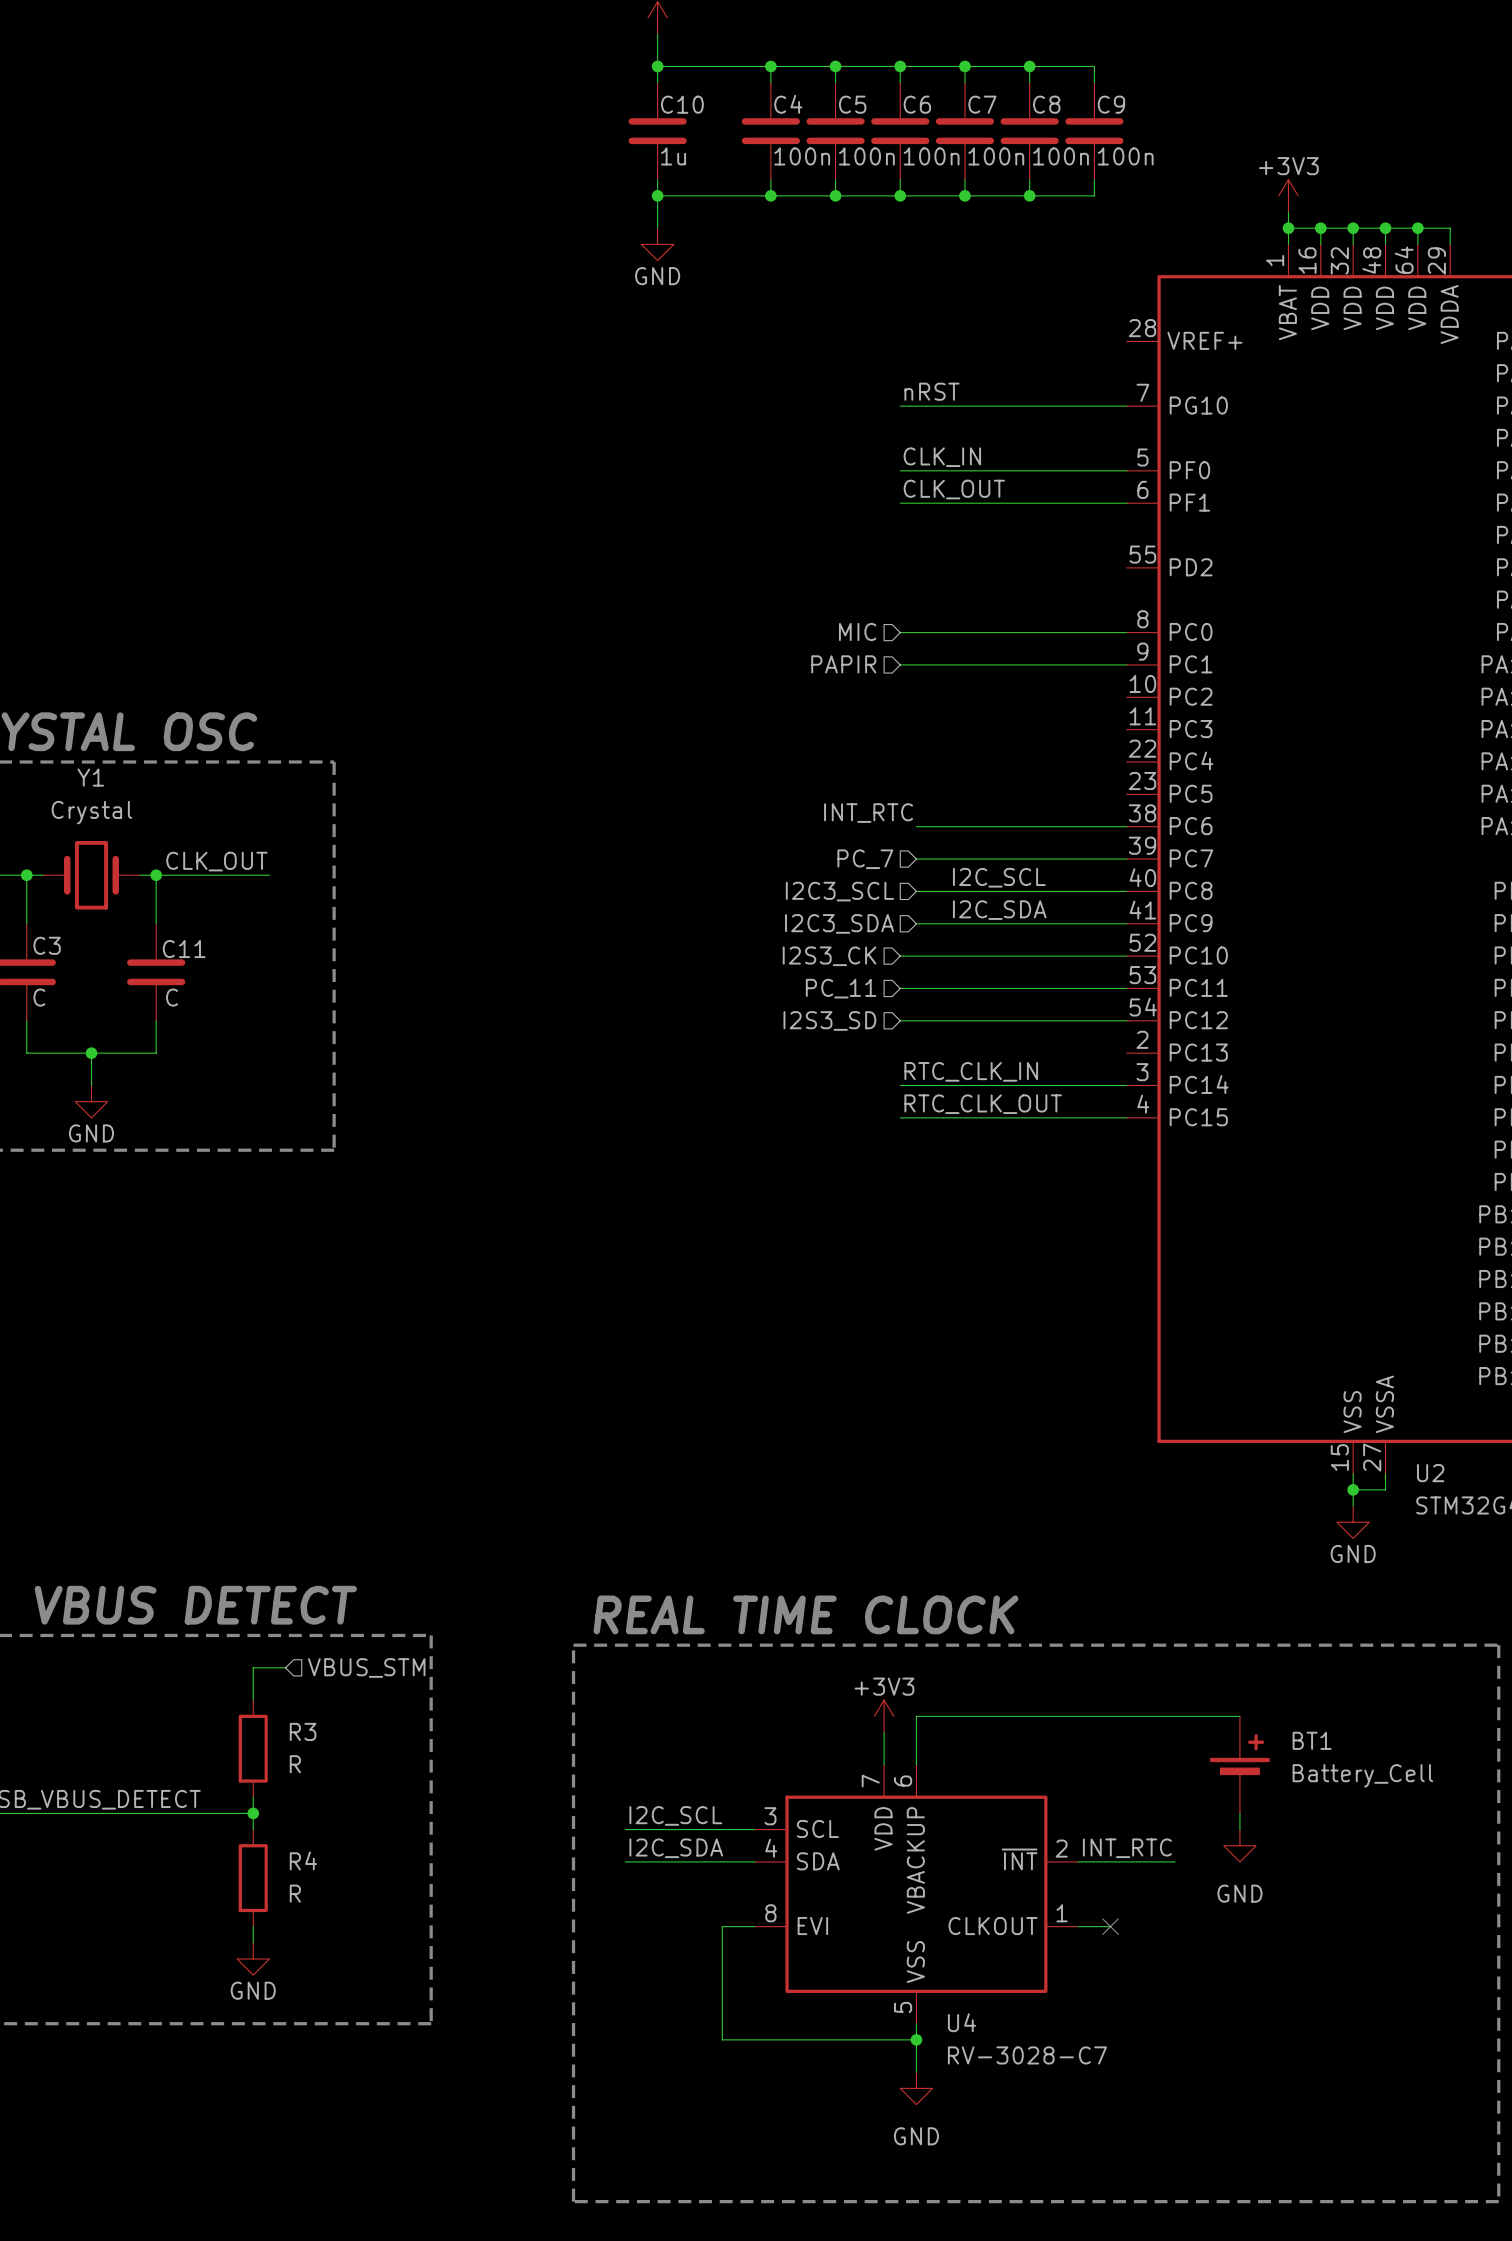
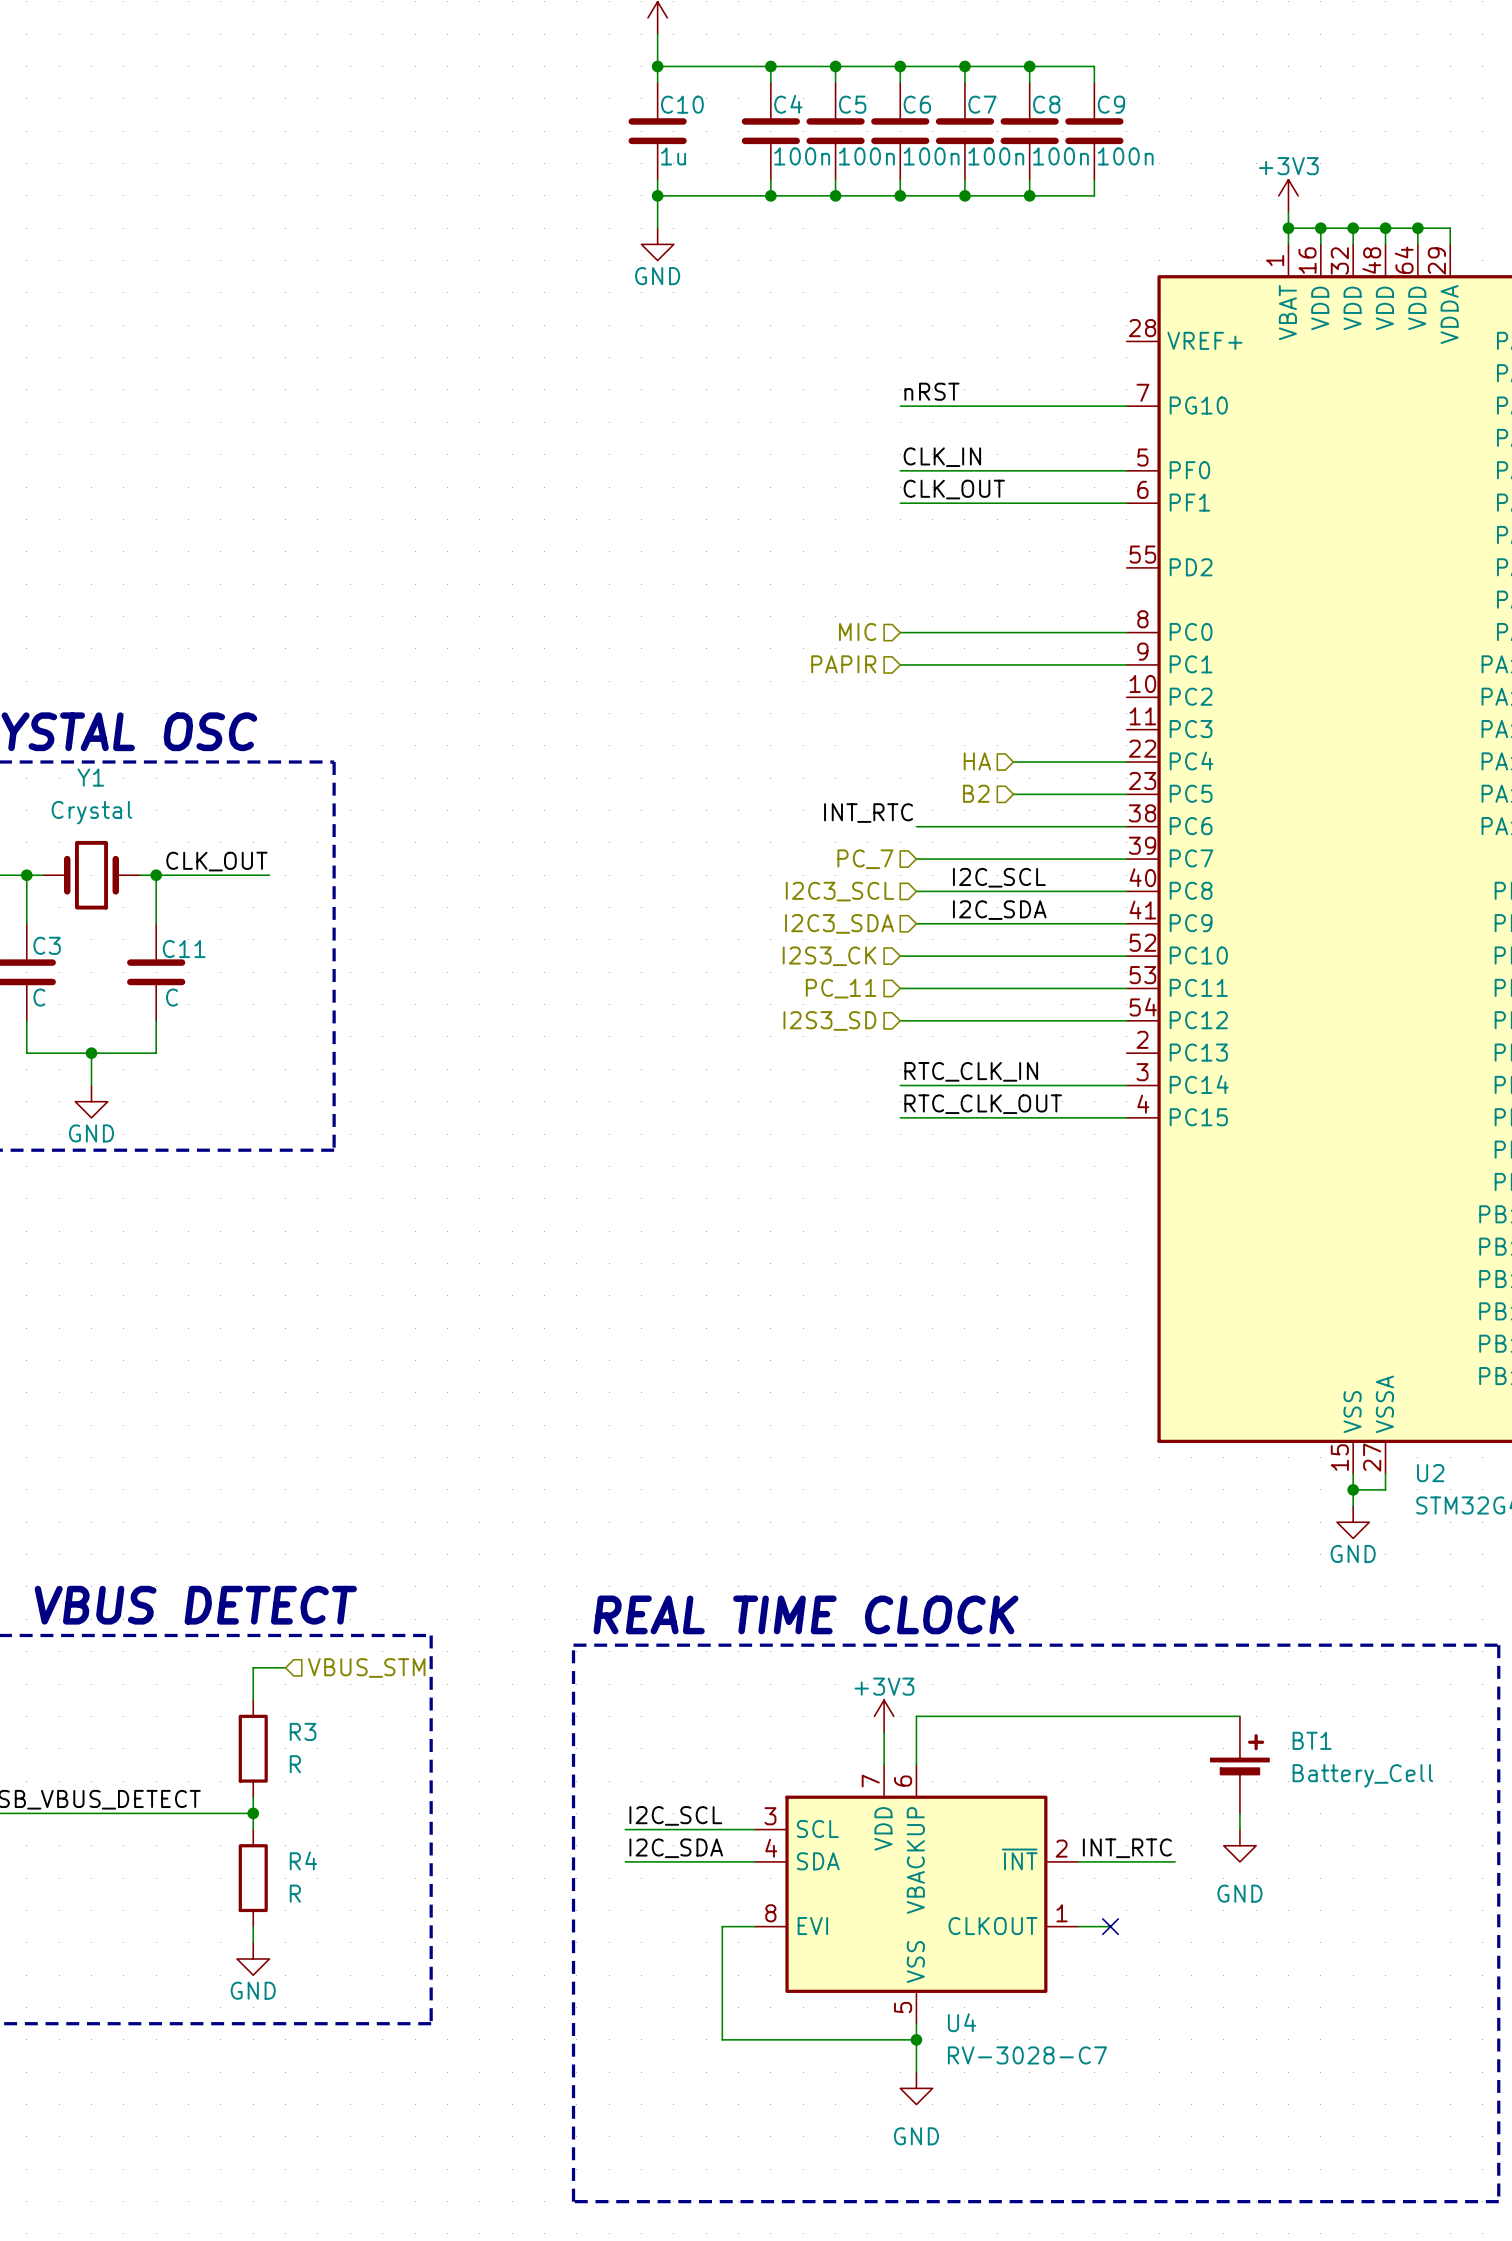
hierarchical label: none -> HA (977, 761)
wire: none -> (1013, 762) (1126, 762)
hierarchical label: none -> B2 (976, 793)
wire: none -> (1013, 794) (1126, 794)

